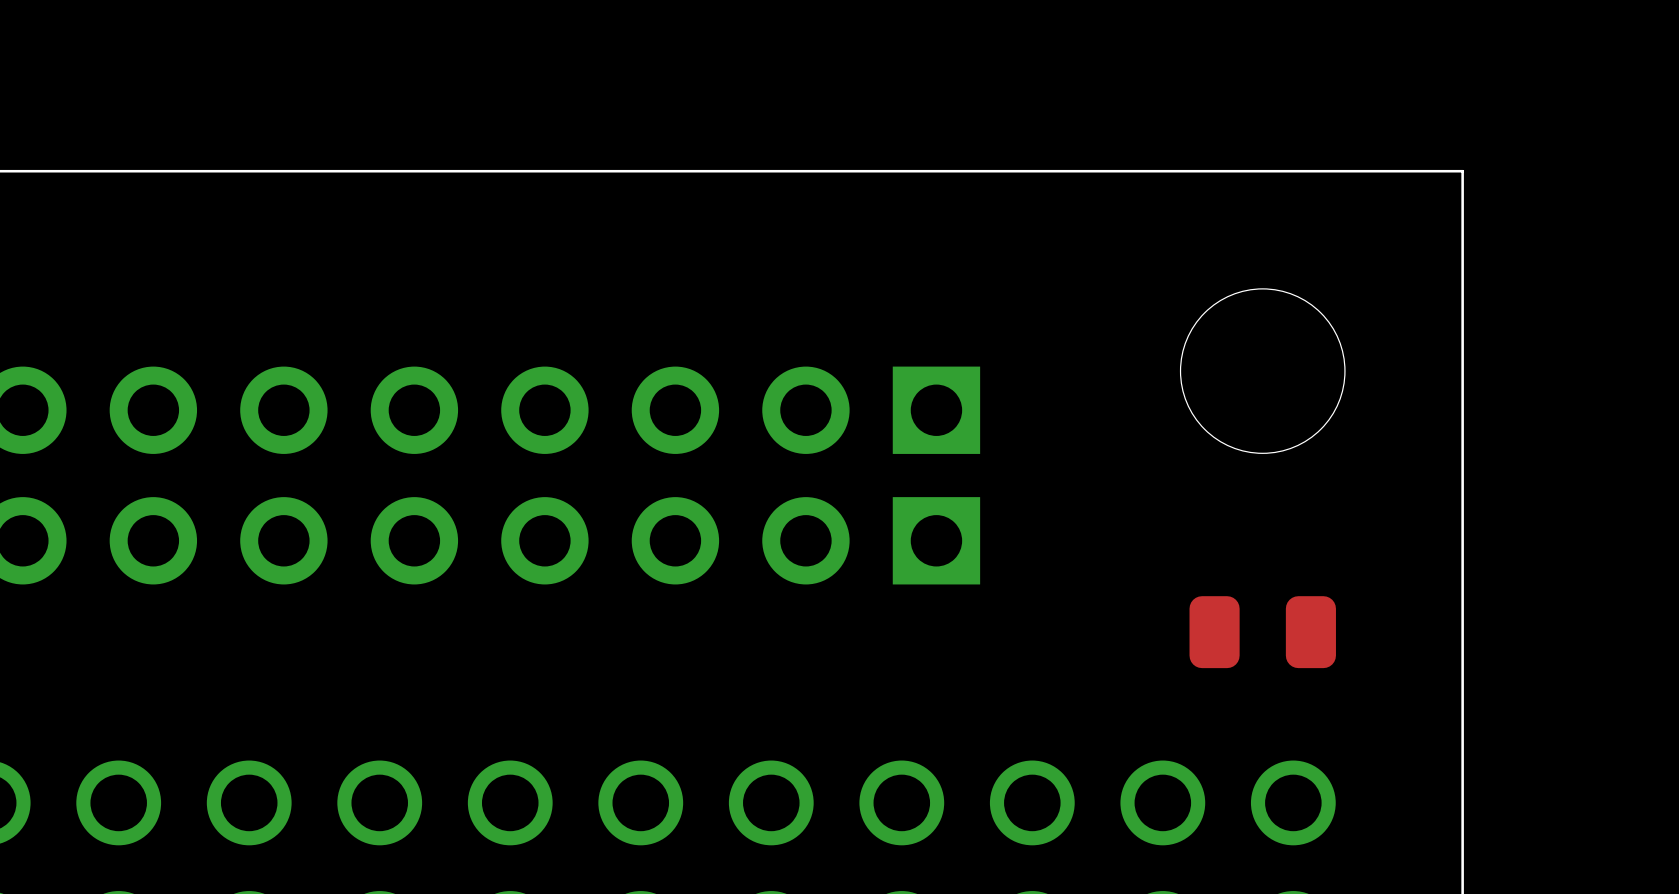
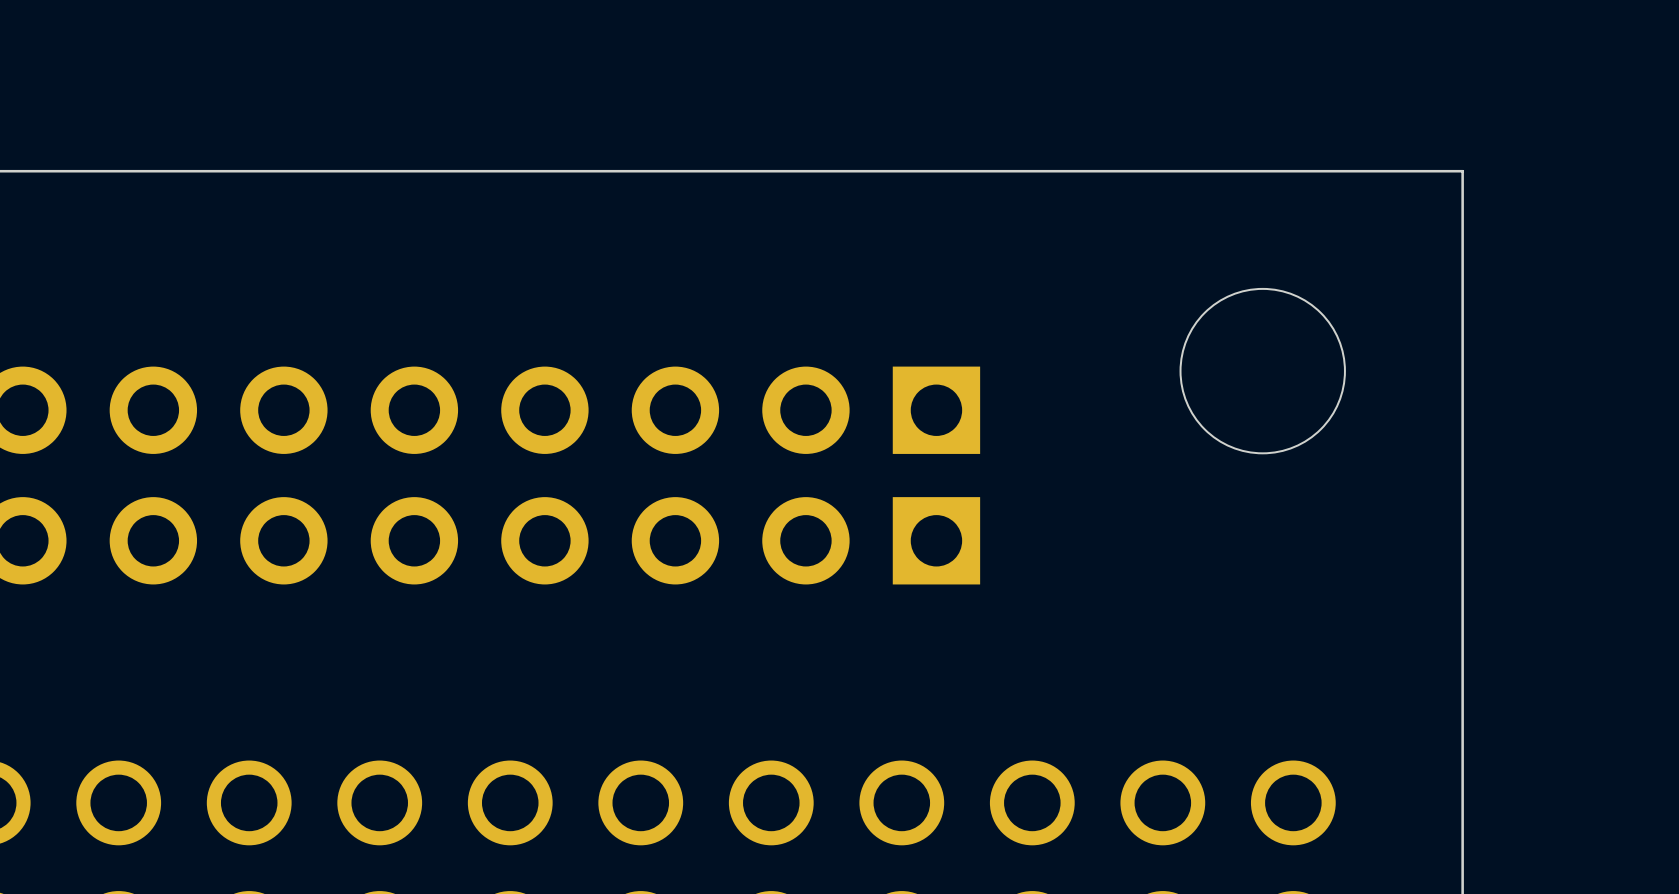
part: (1262, 632) -> none

